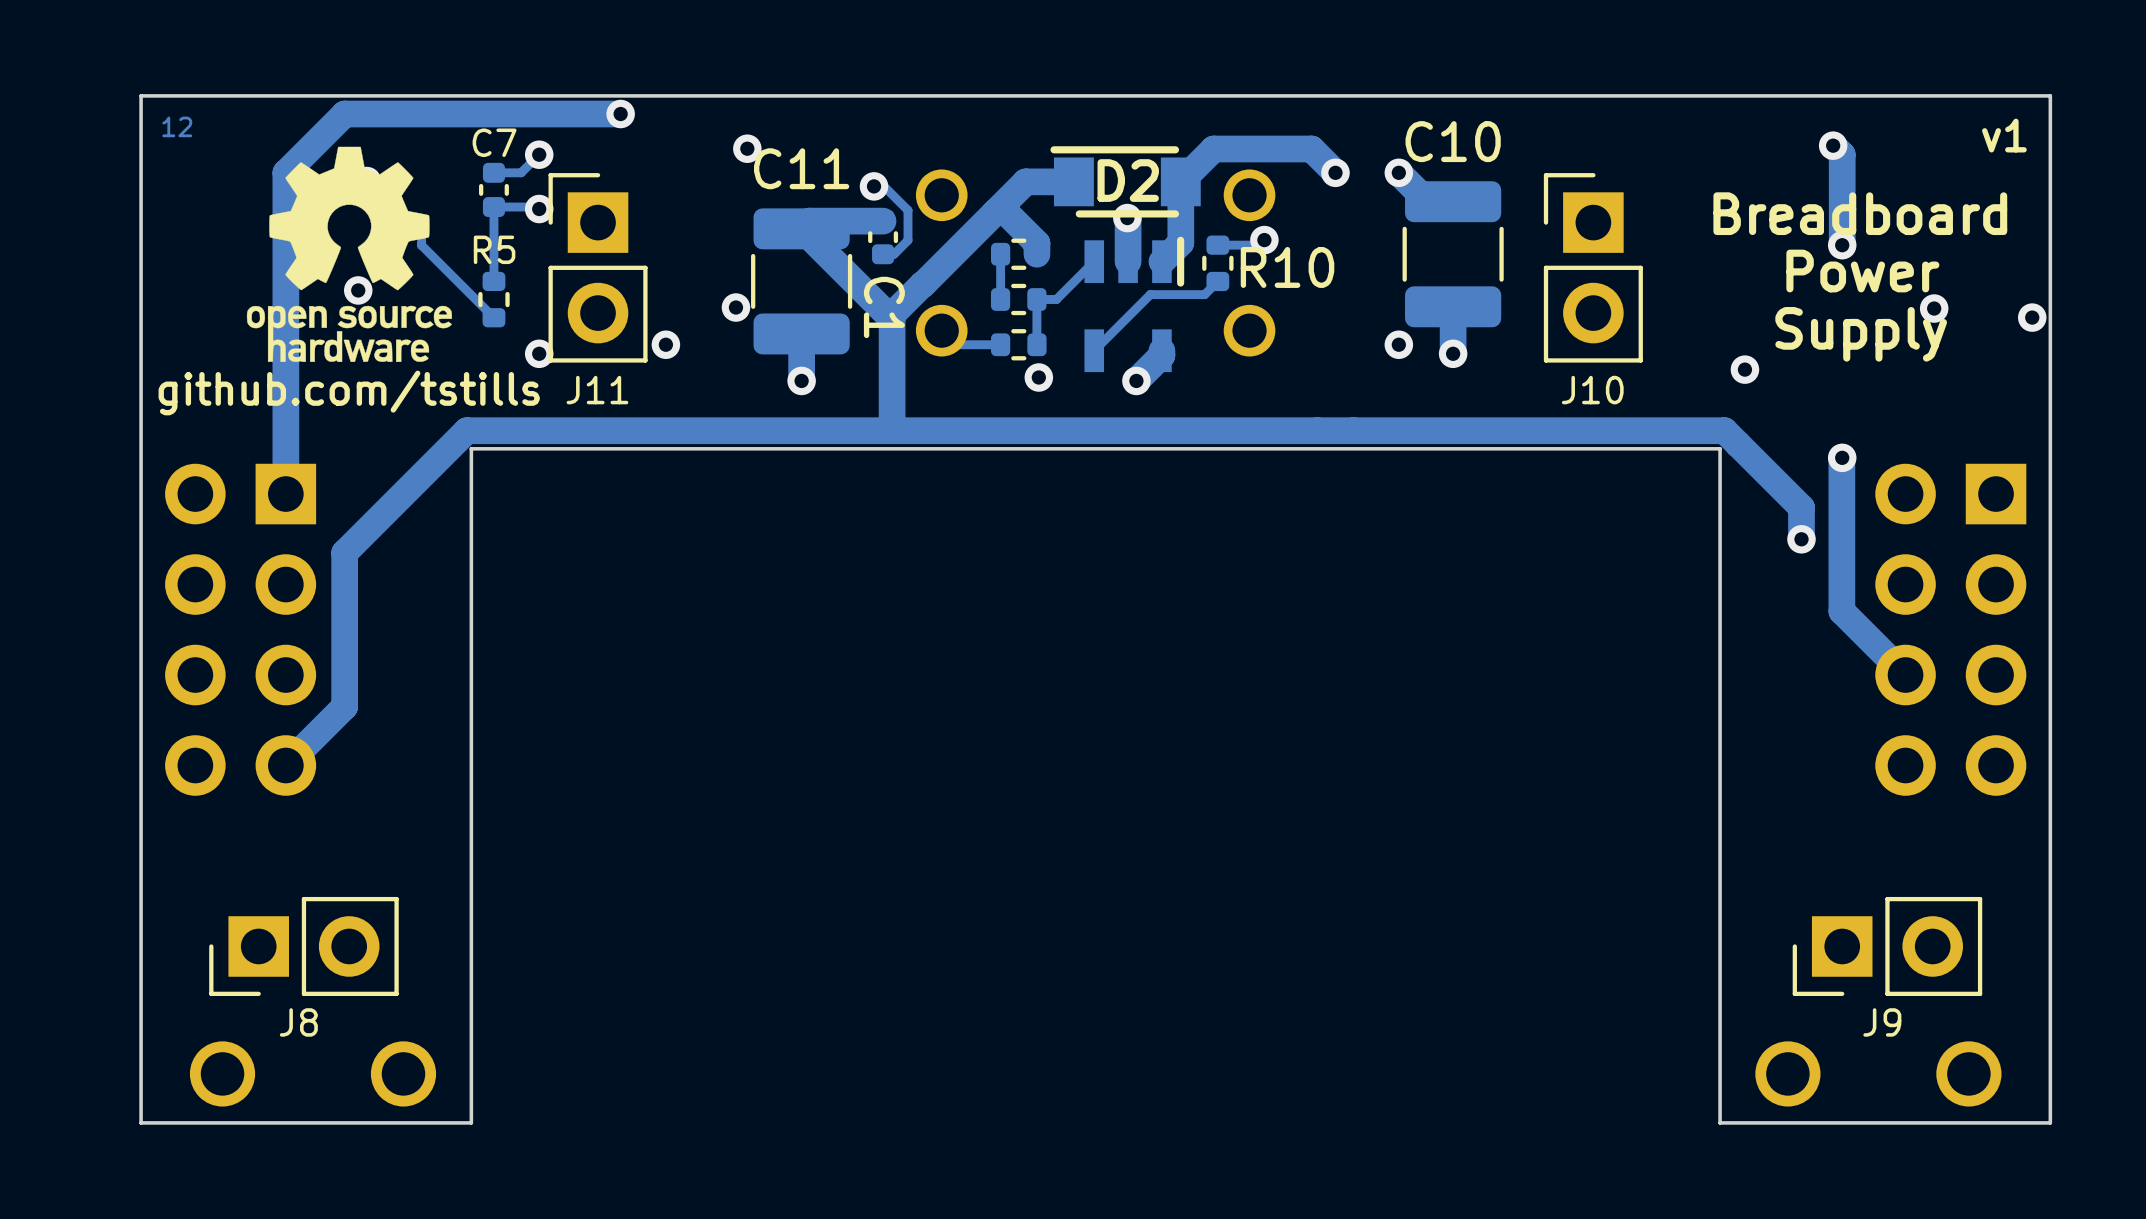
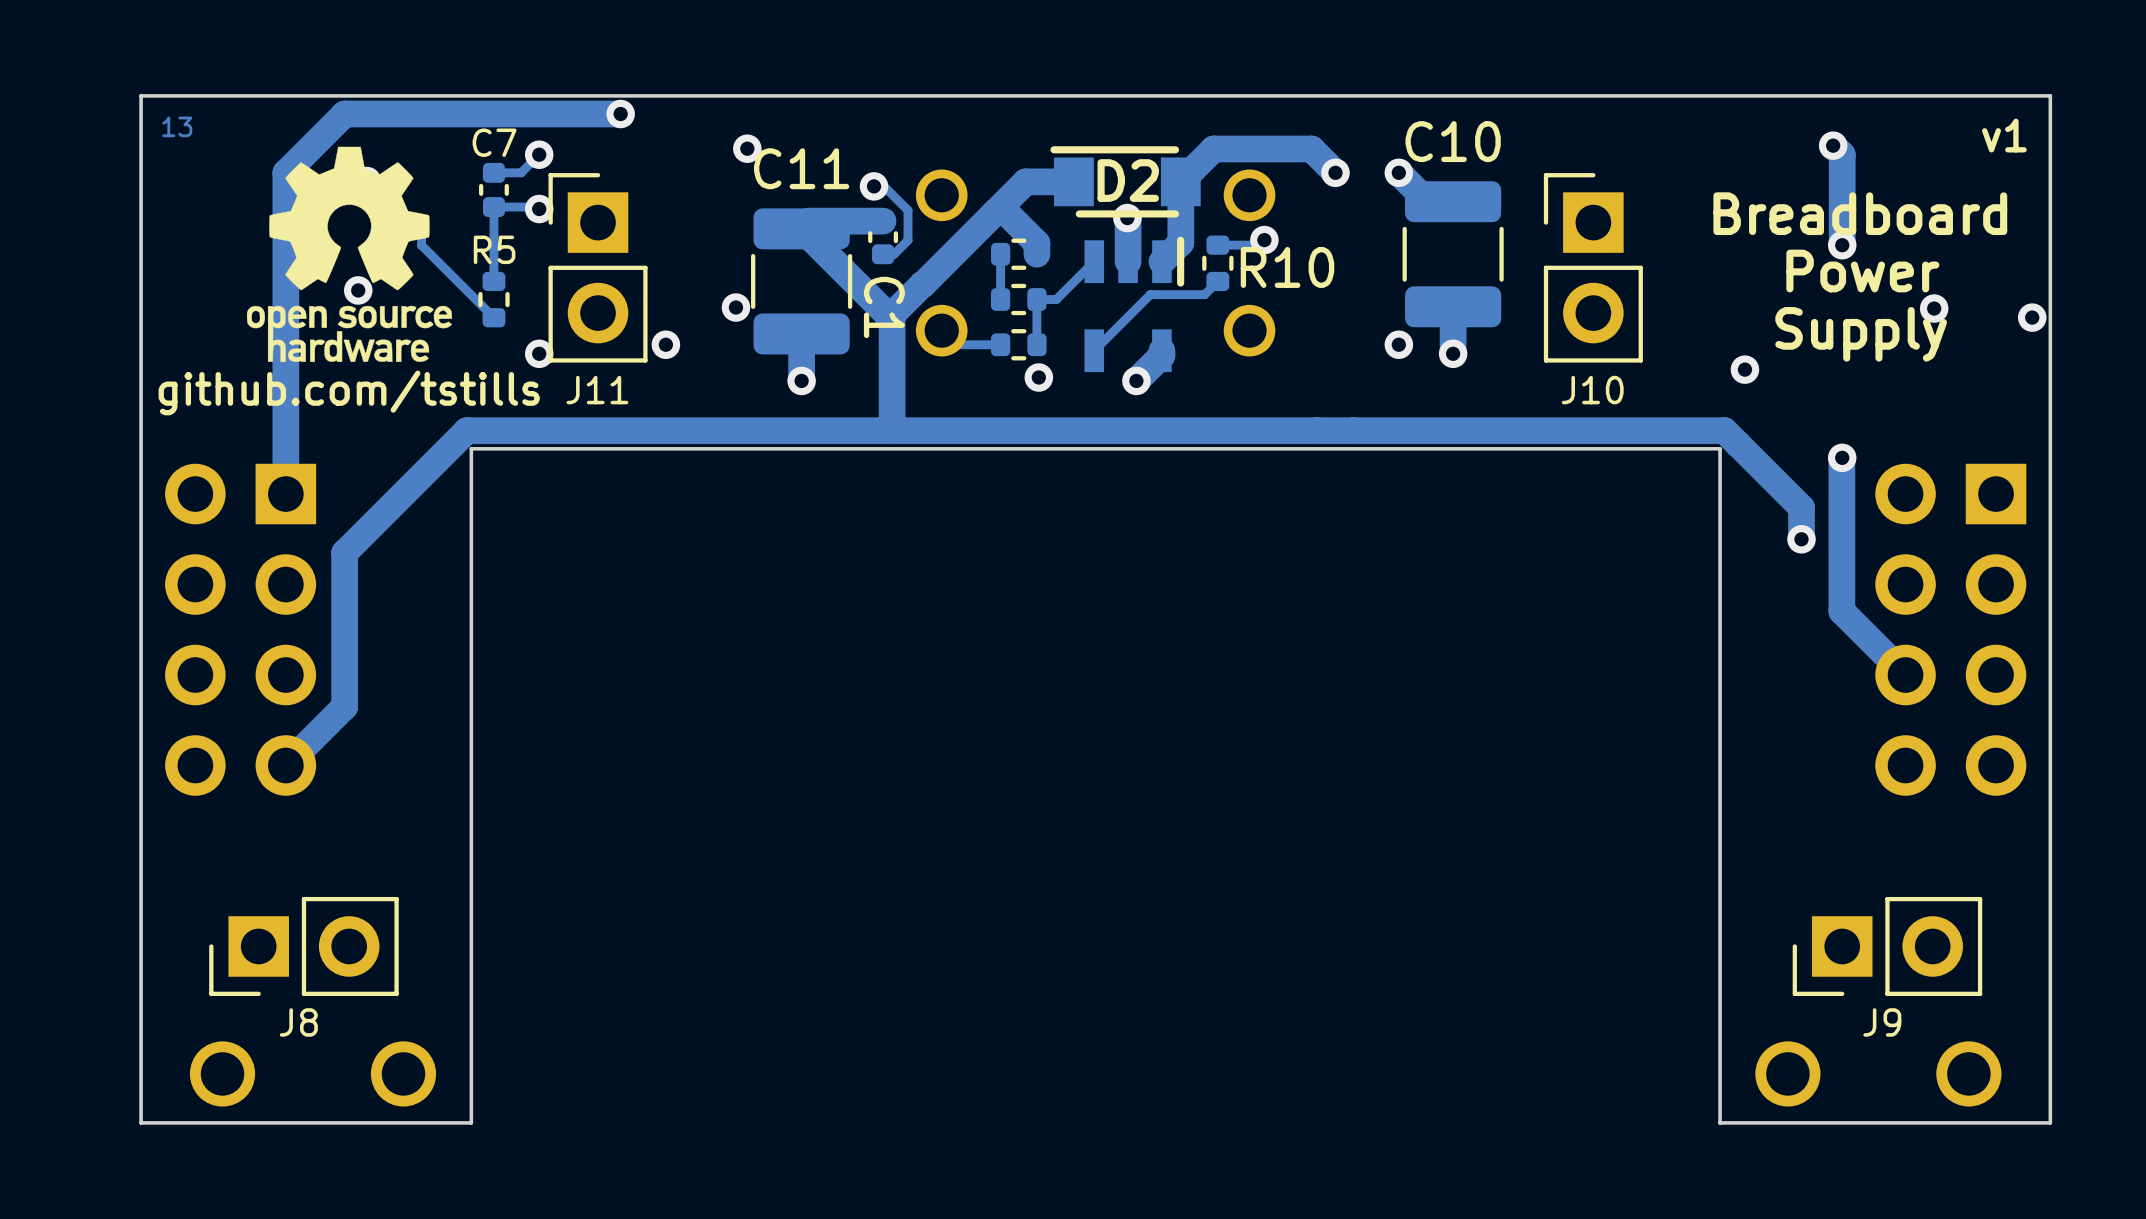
text: 12 (177, 126) -> 13 (177, 126)

